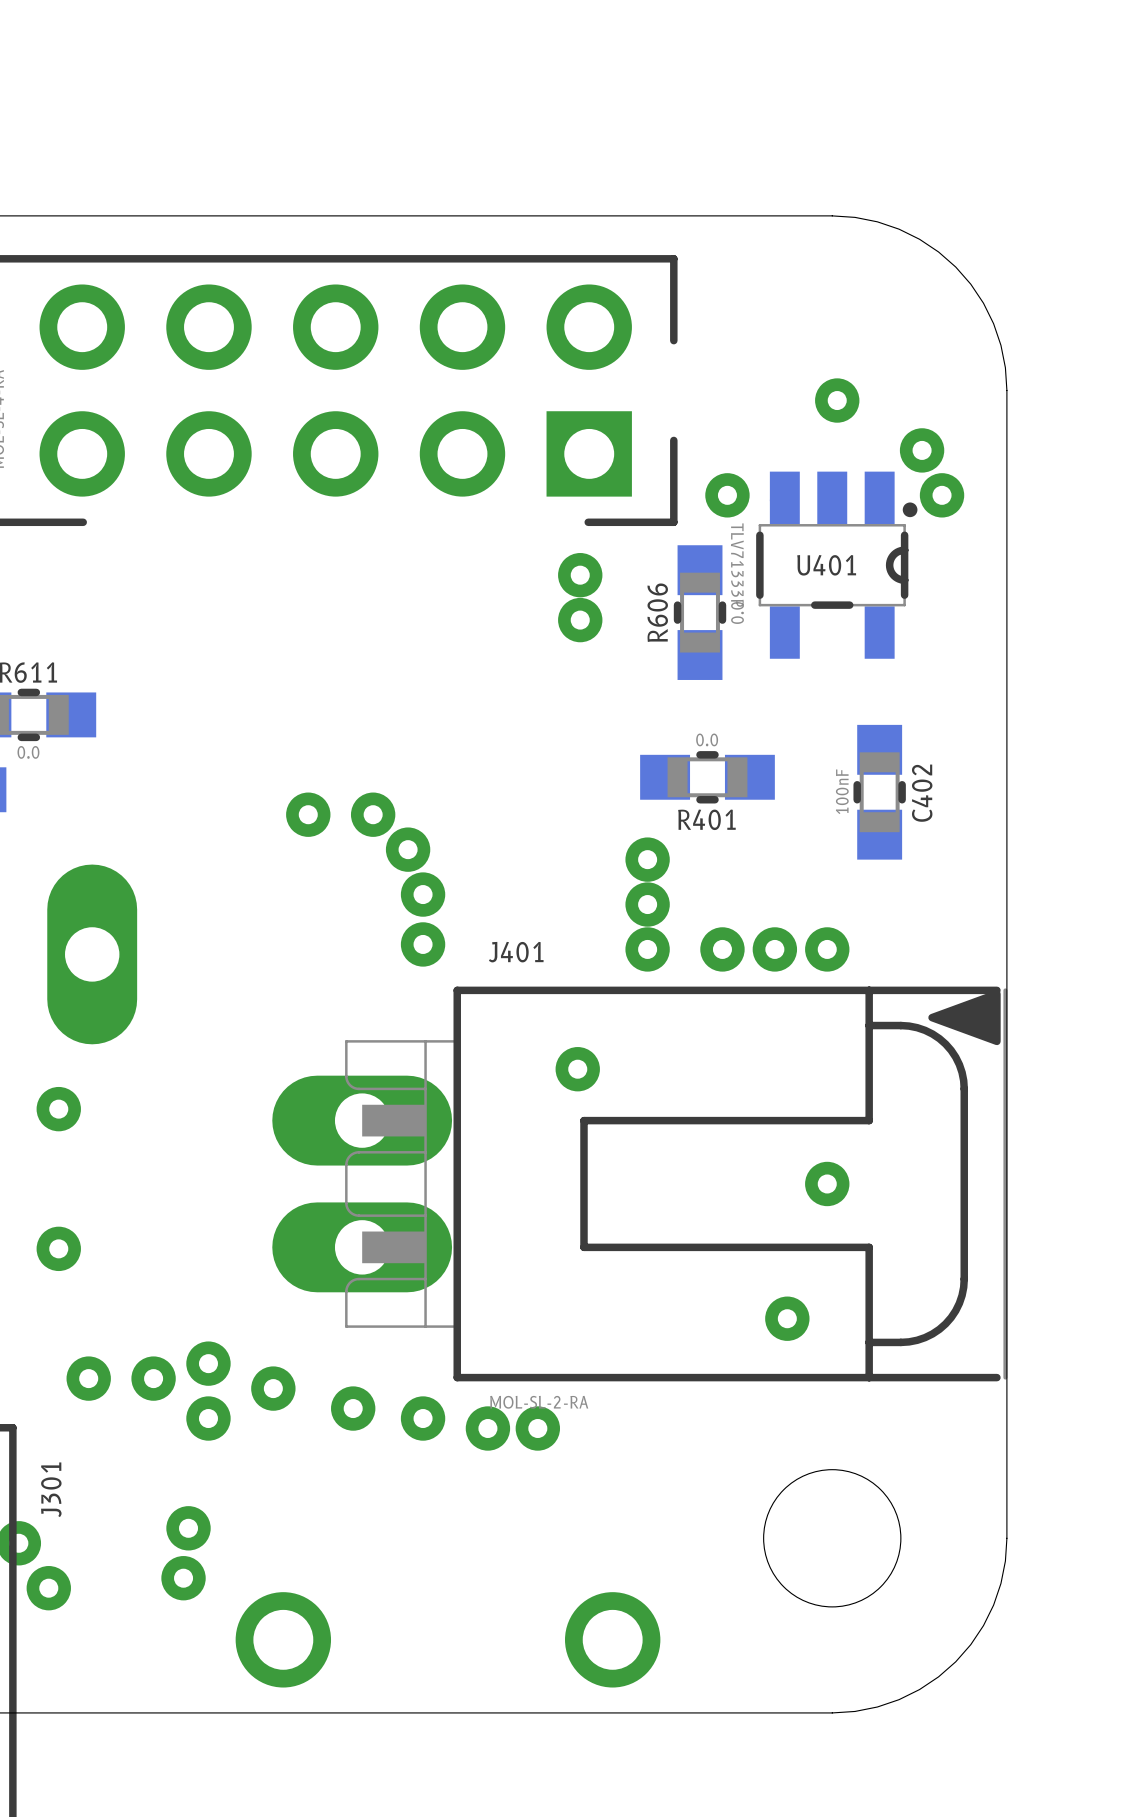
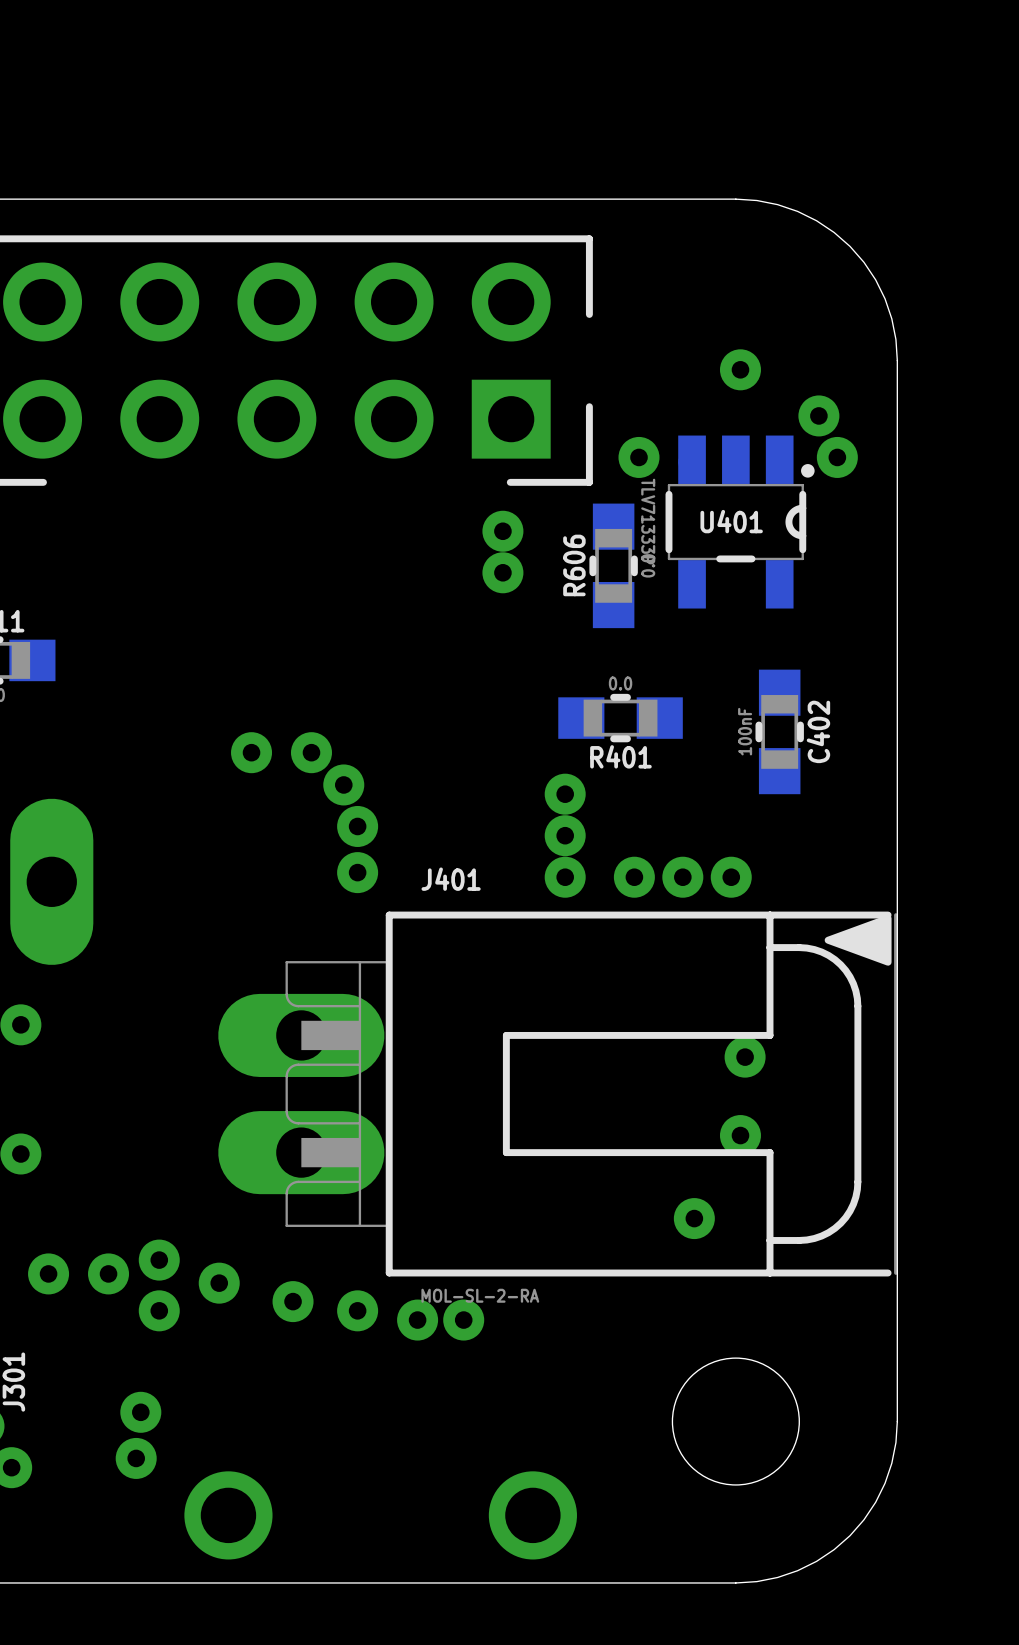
via: (577, 1069) -> none
via position: (827, 1183) -> (745, 1057)
via: none -> (740, 1135)

